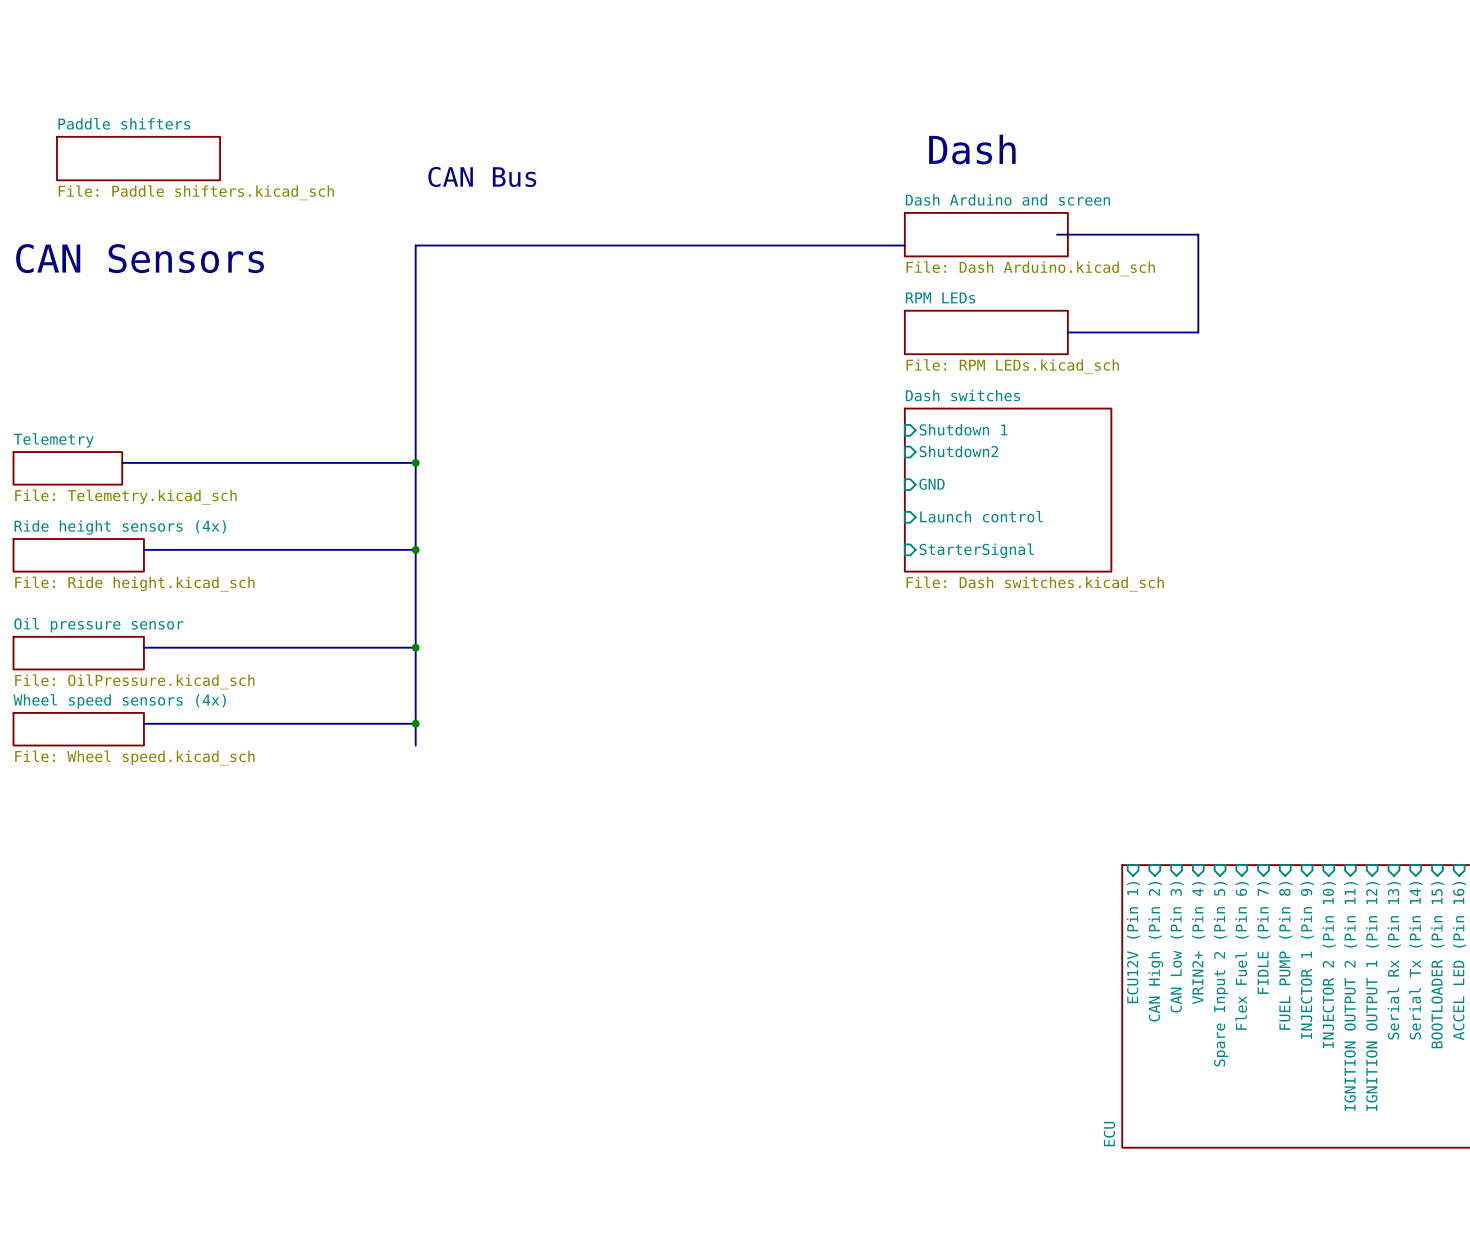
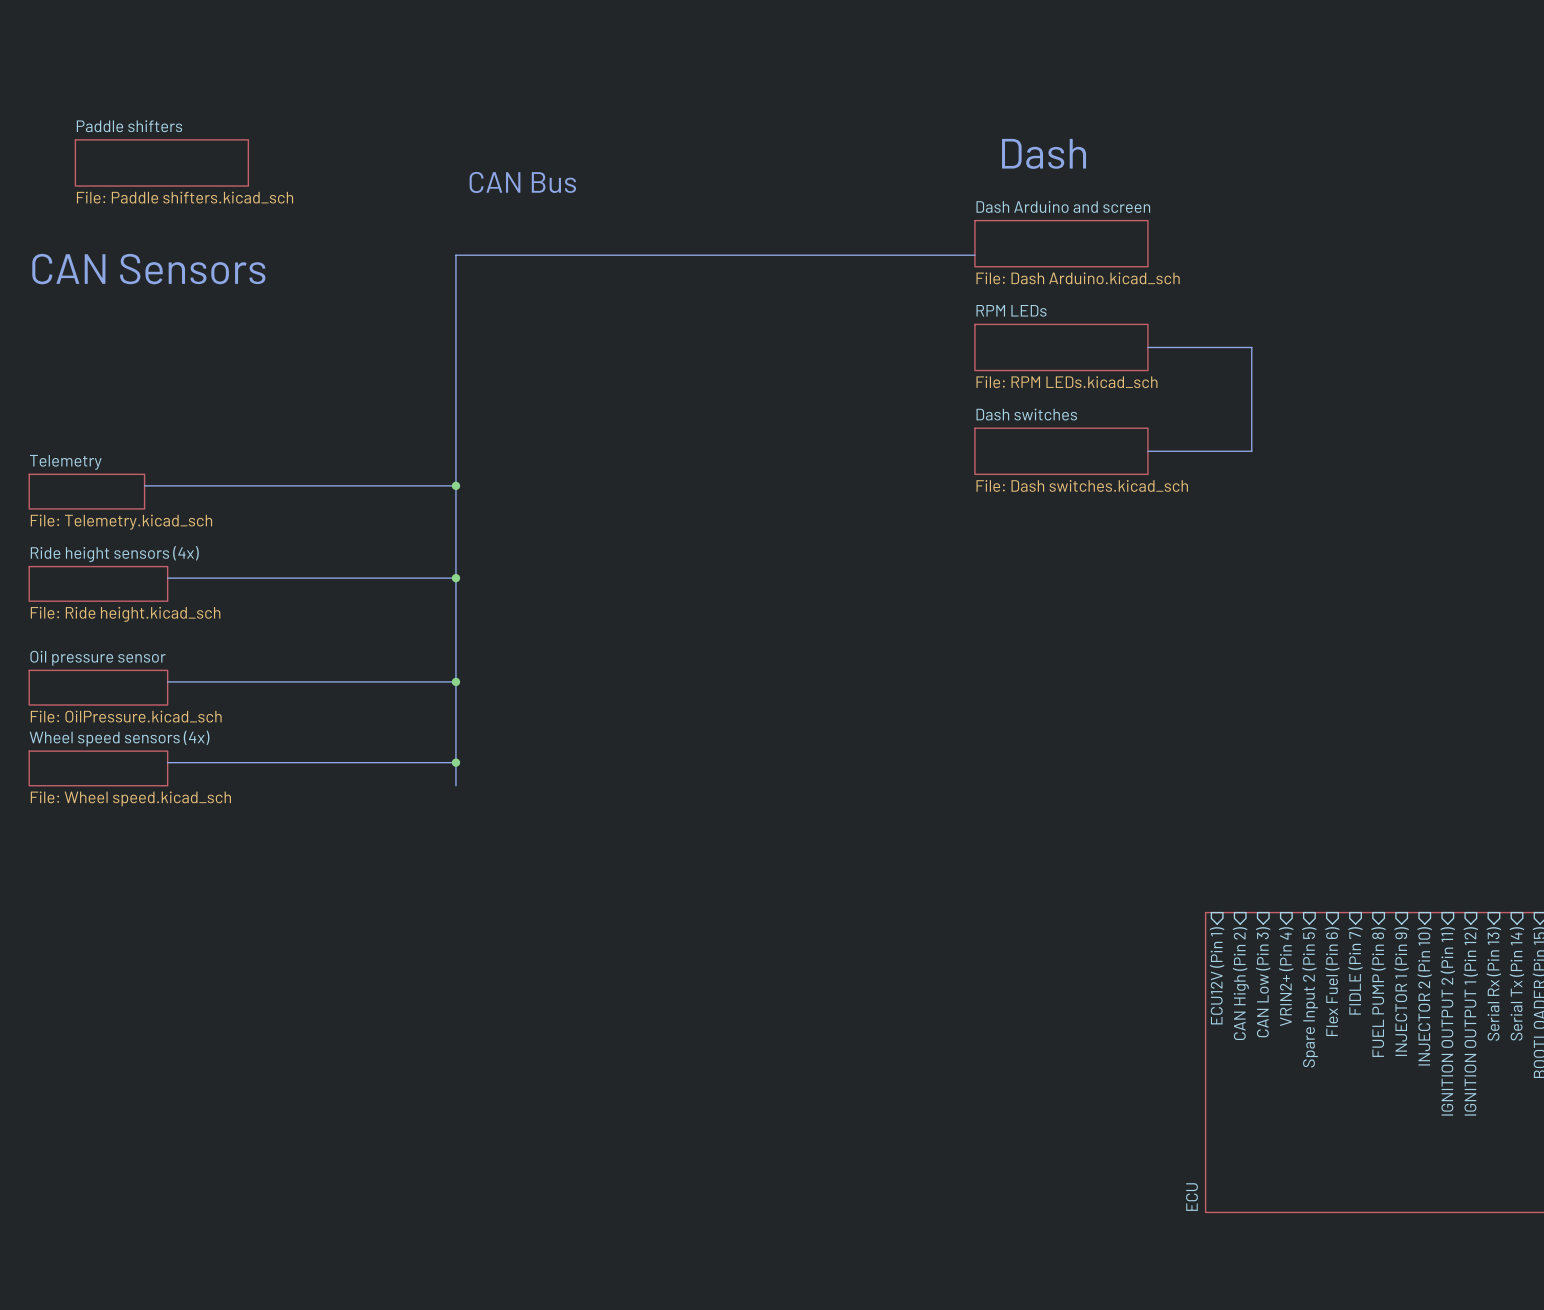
bus: (1057, 234) (1198, 234) (1198, 332) (1165, 332) -> (1147, 451) (1251, 451) (1251, 347)
sheet pin: Shutdown 1 (963, 429) -> none
sheet Dash switches: none -> File: Dash switches.kicad_sch (1061, 451)
sheet pin: Shutdown2 (958, 451) -> none
sheet pin: GND (932, 484) -> none
sheet Dash switches: File: Dash switches.kicad_sch (1008, 490) -> none
sheet pin: Launch control (981, 516) -> none
sheet pin: StarterSignal (976, 550) -> none

